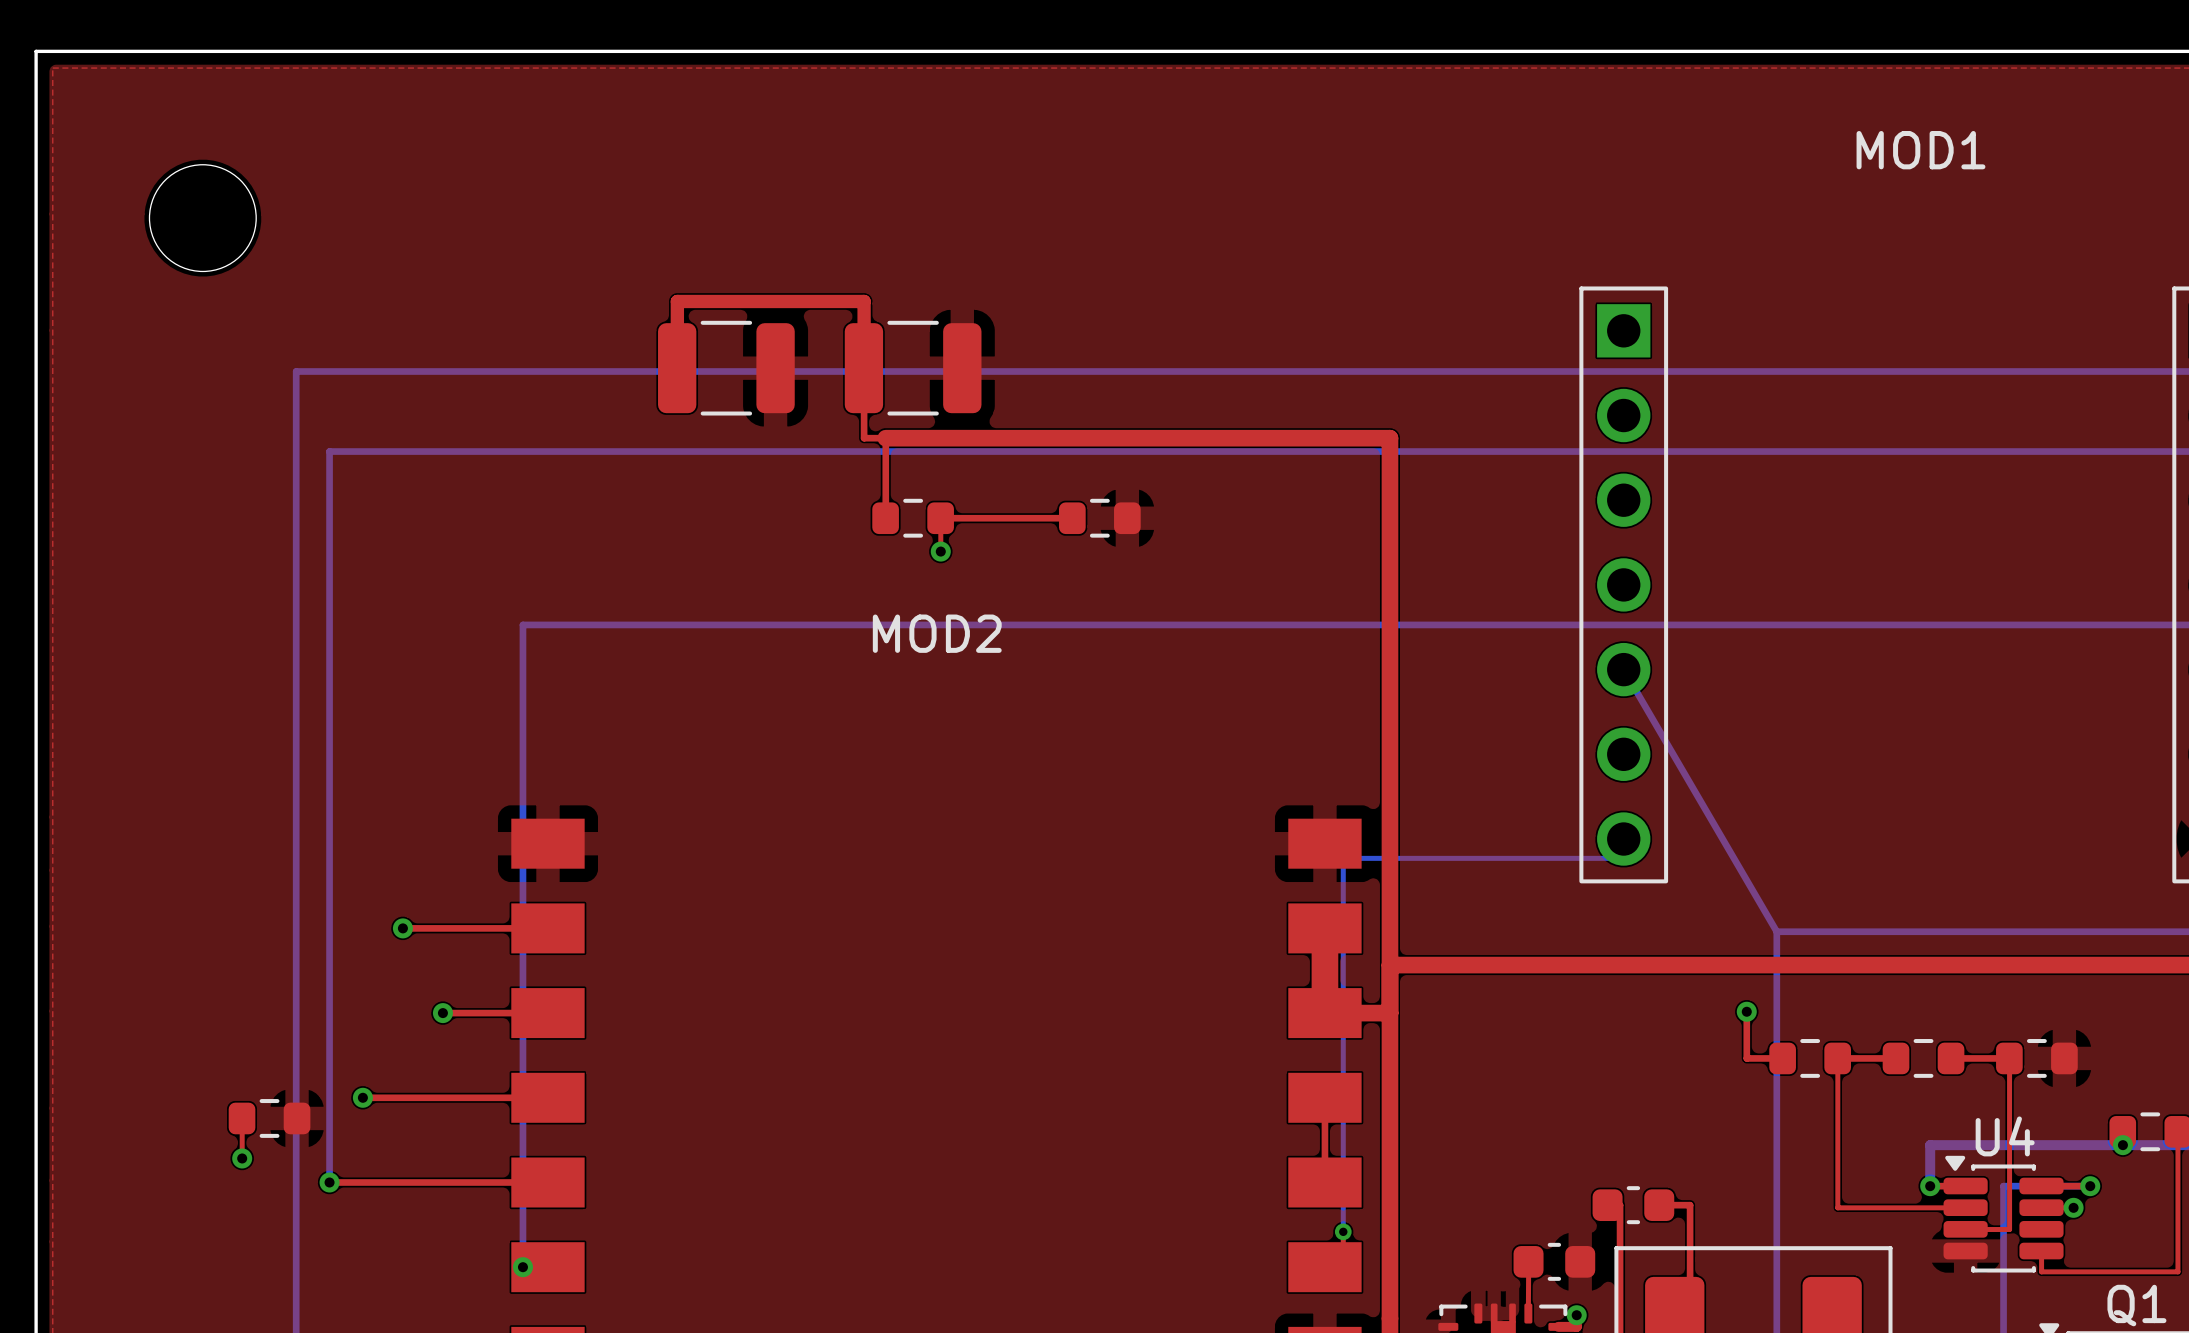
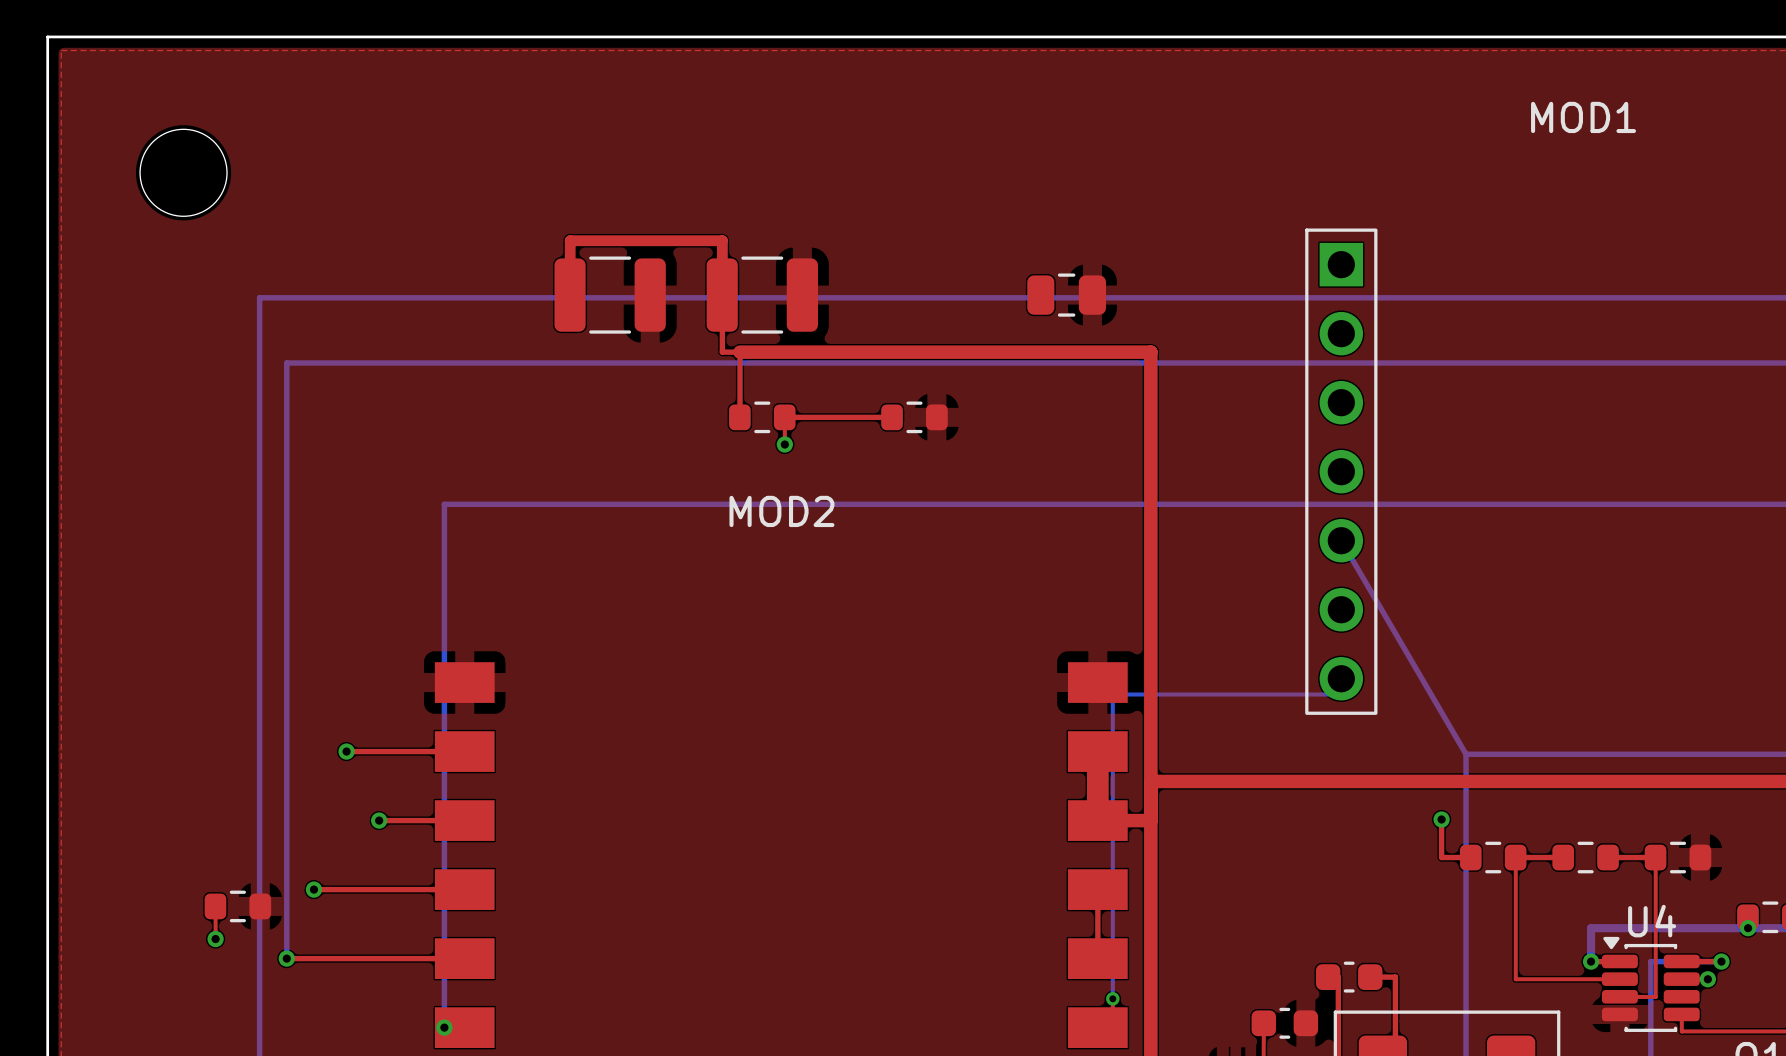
part: none -> (1066, 295)

